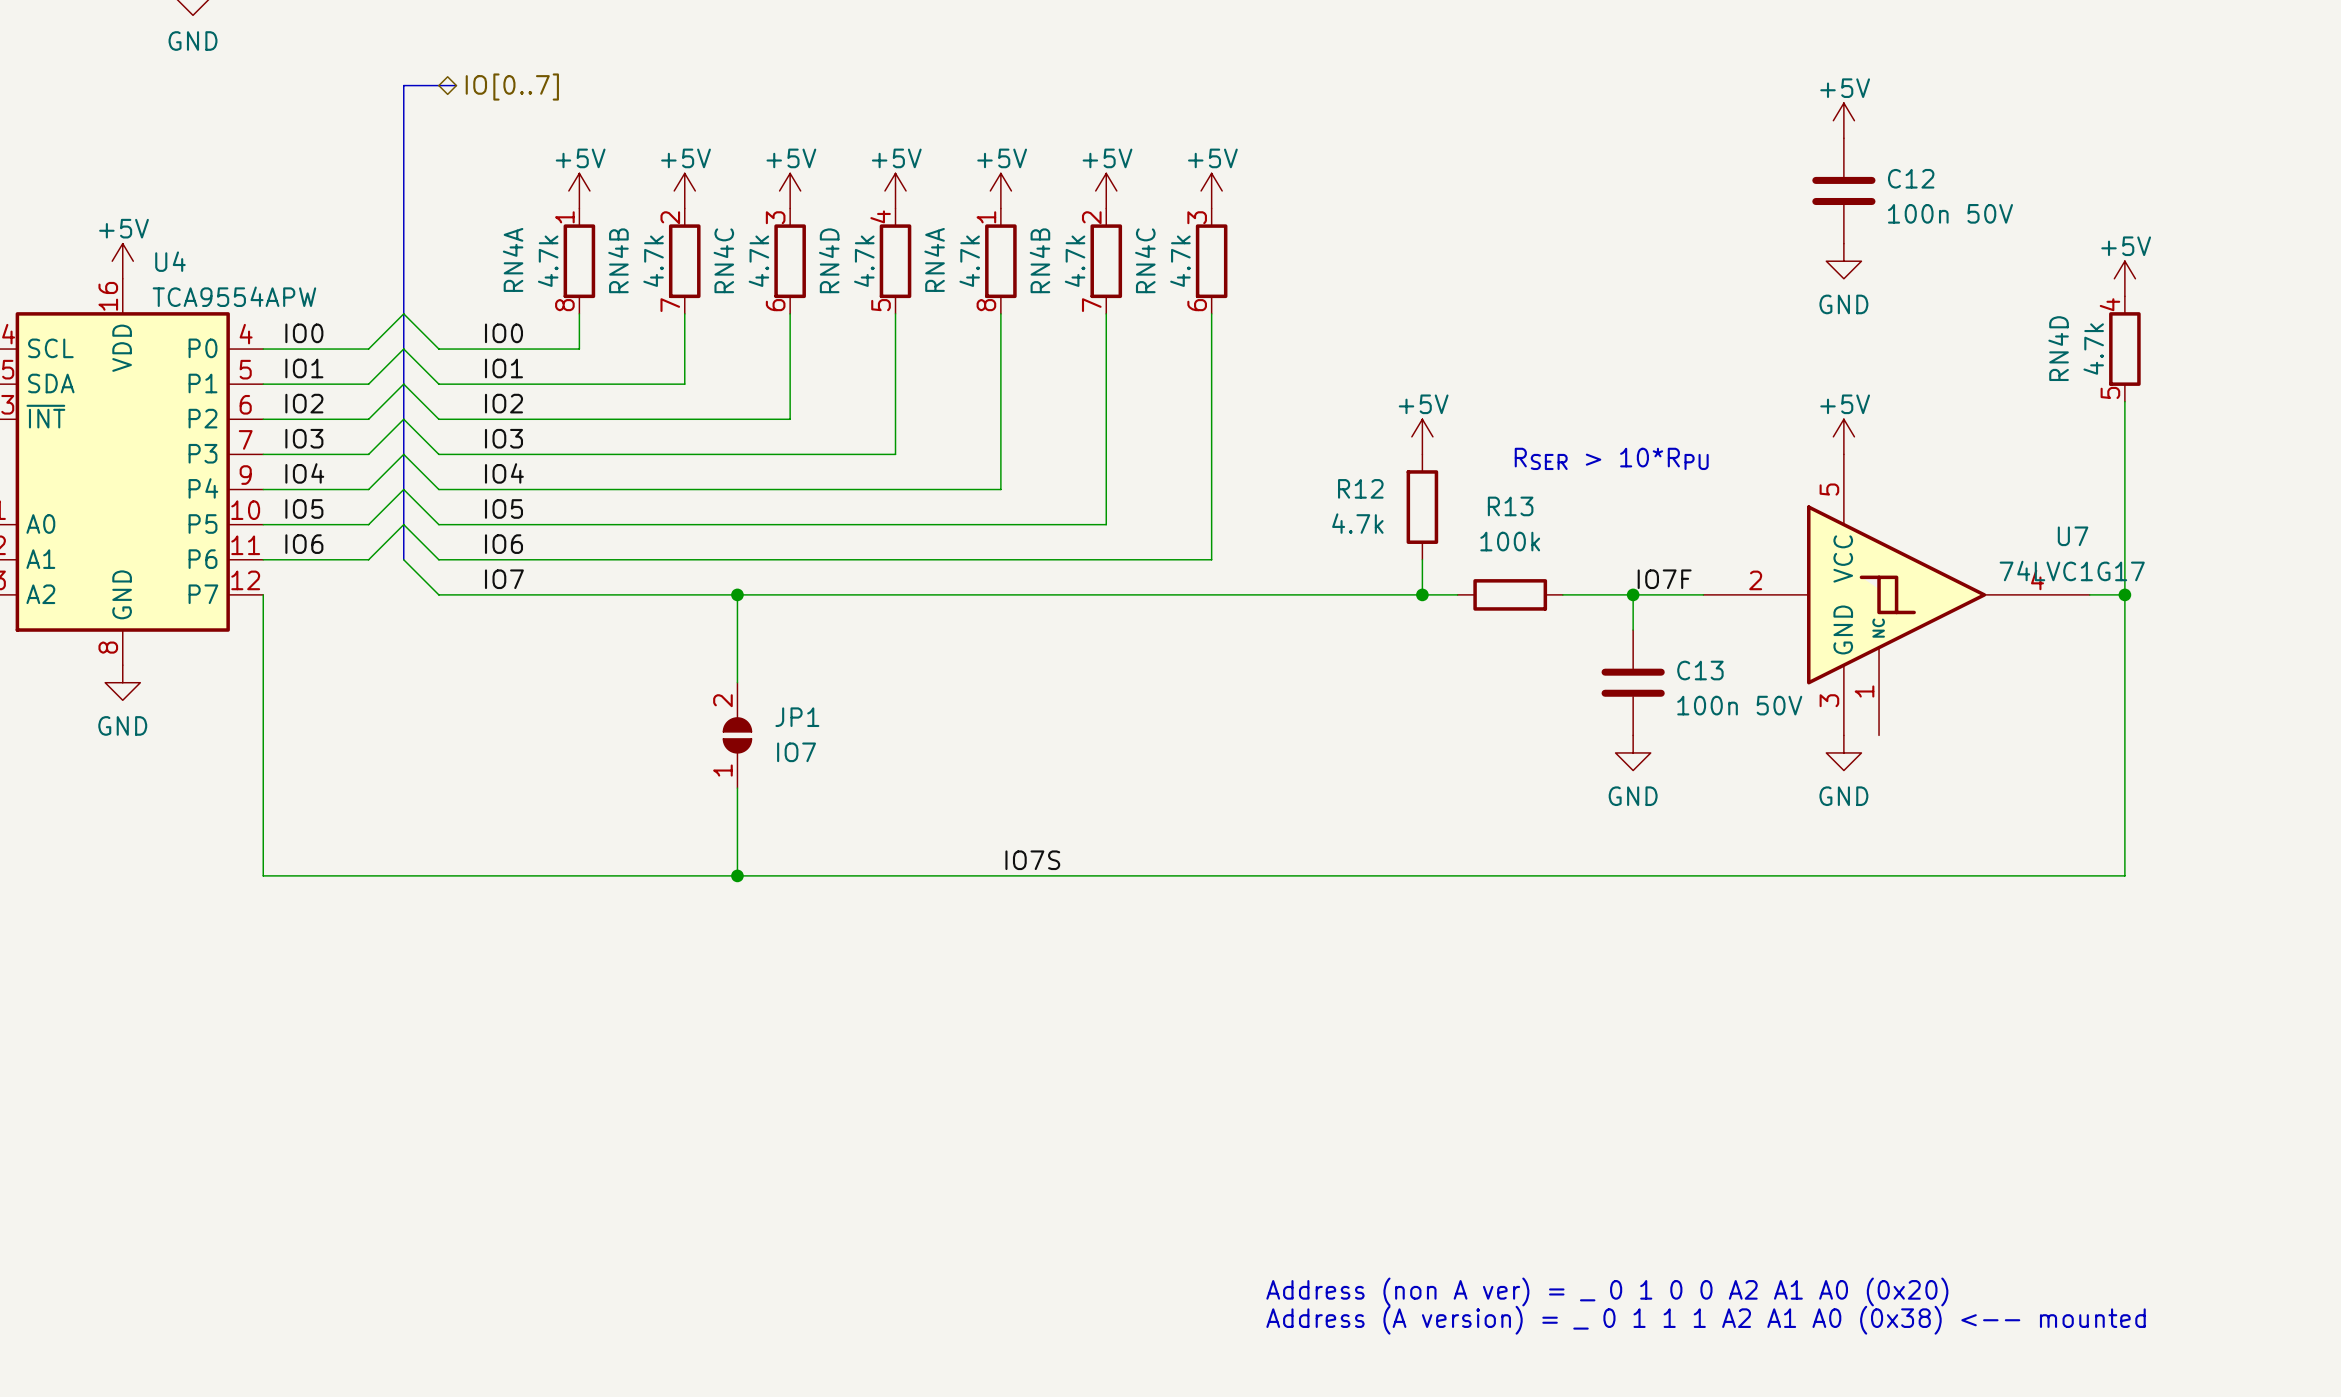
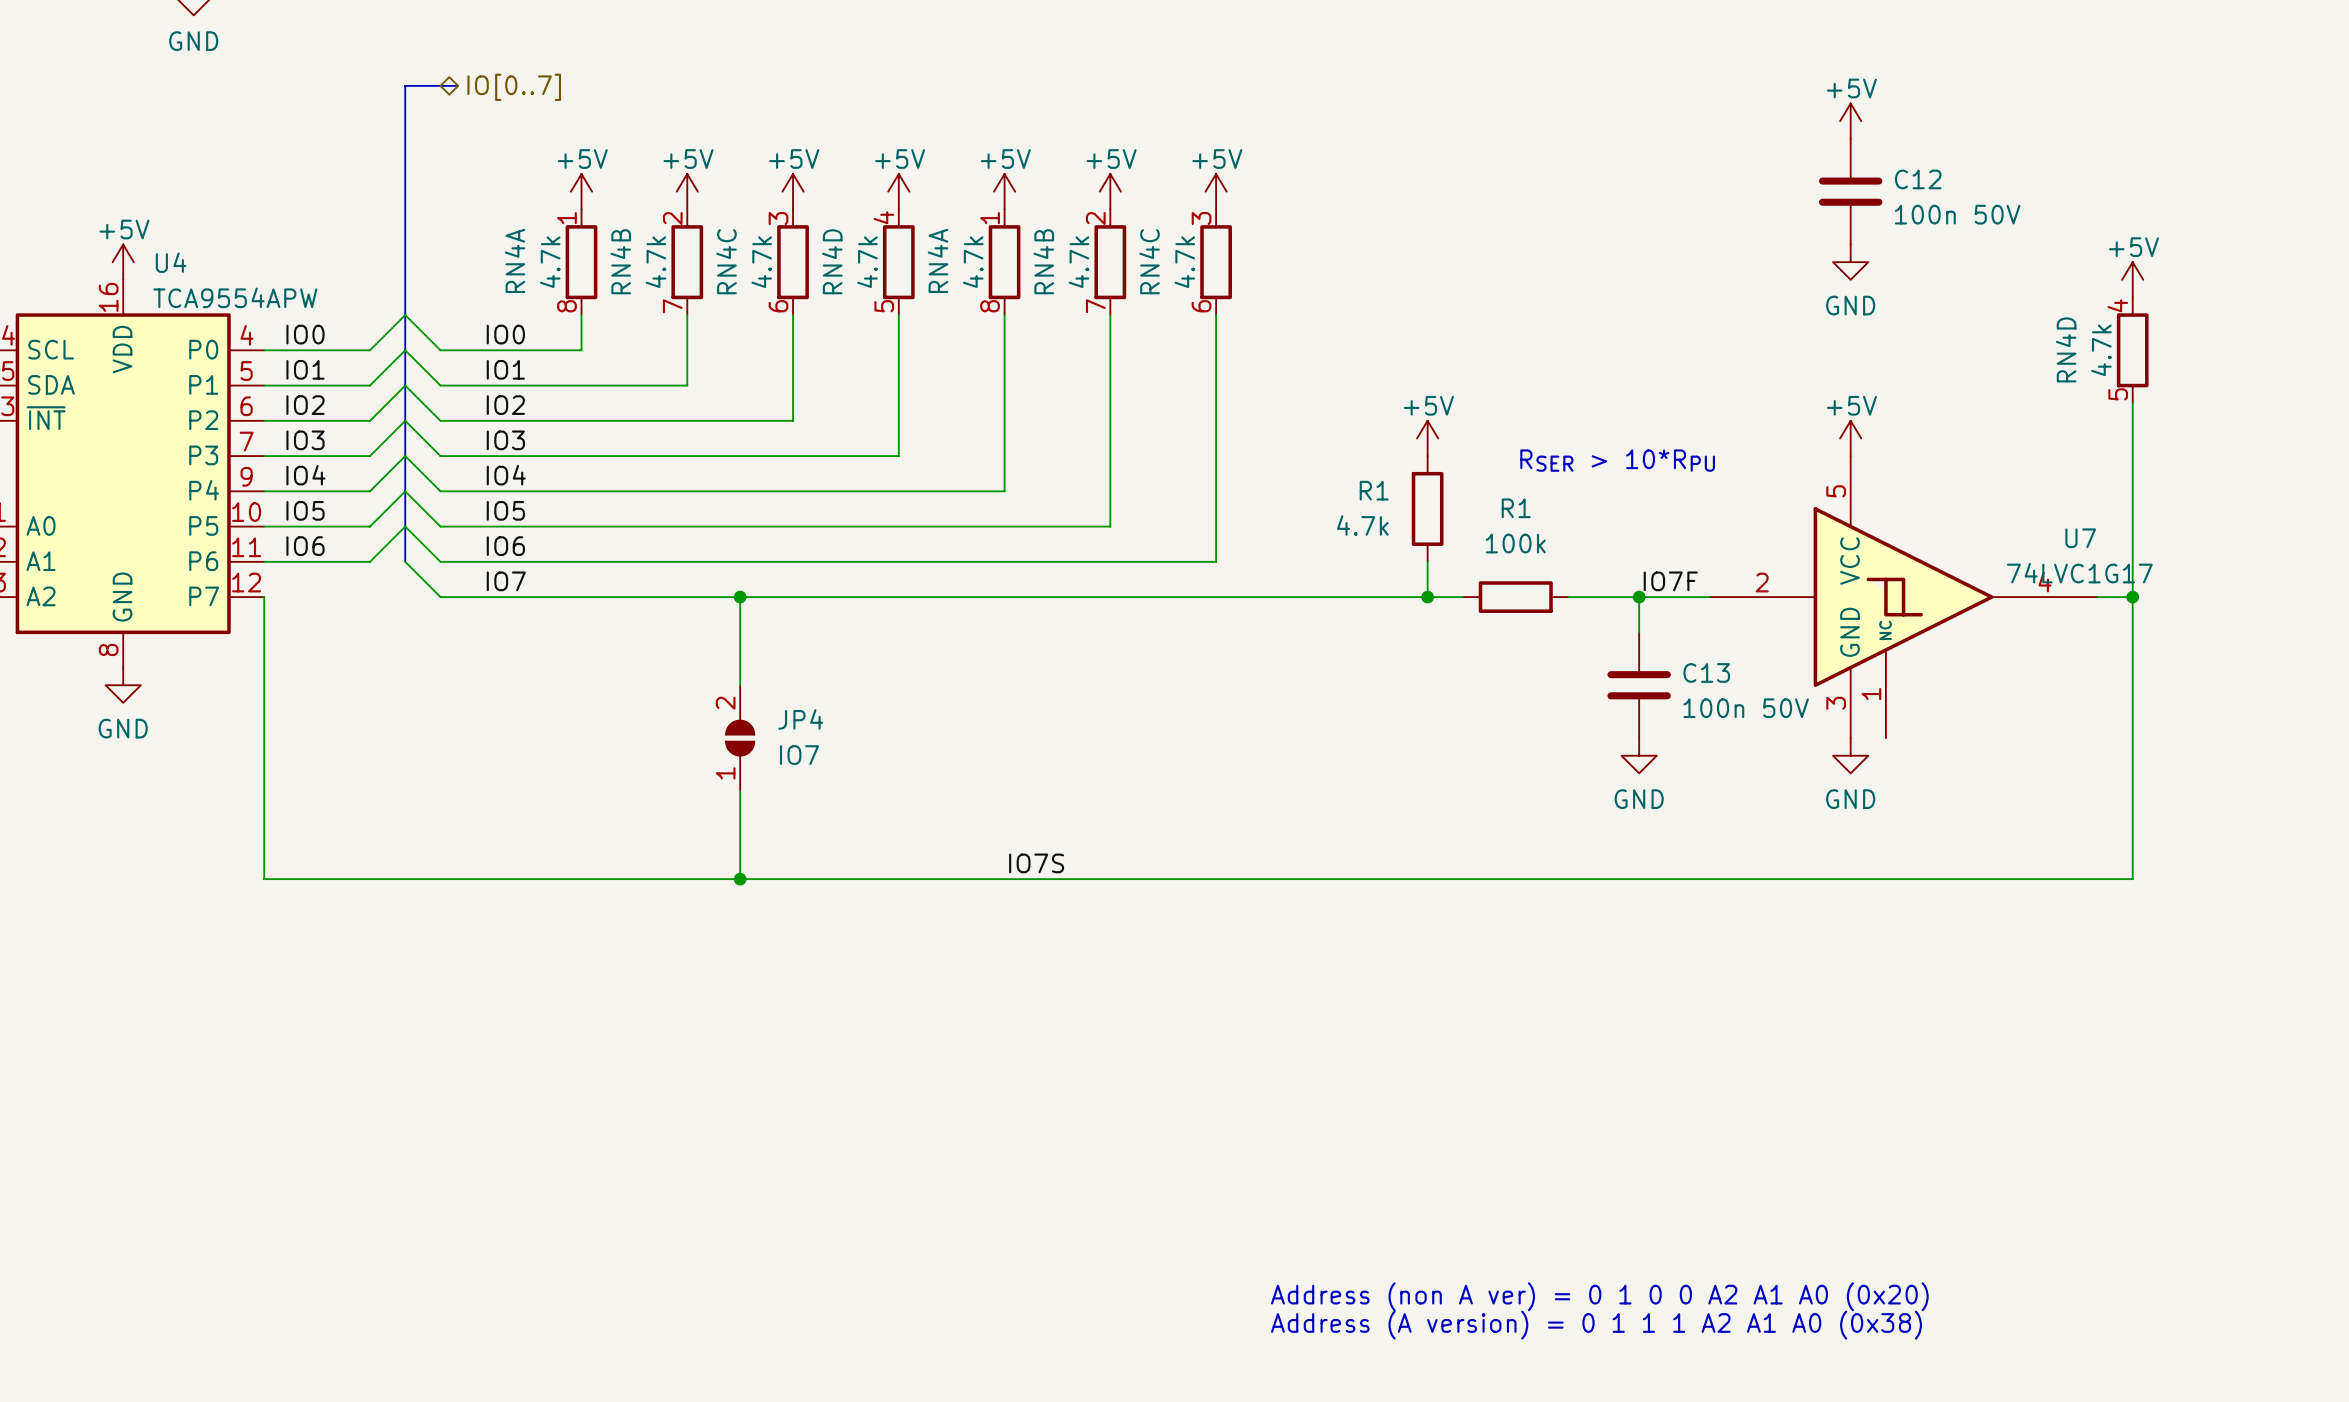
R12 name: R12 (1360, 488) -> R1 (1374, 490)
R13 name: R13 (1510, 506) -> R1 (1516, 508)
JP1 name: JP1 (797, 717) -> JP4 (800, 719)
text: Address (non A ver) = _ 0 1 0 0 A2 A1 A0 (0x20) (1607, 1291) -> Address (non A ver) = 0 1 0 0 A2 A1 A0 (0x20) (1599, 1296)
text: Address (A version) = _ 0 1 1 1 A2 A1 A0 (0x38) <-- mounted (1706, 1320) -> Address (A version) = 0 1 1 1 A2 A1 A0 (0x38) (1596, 1325)

